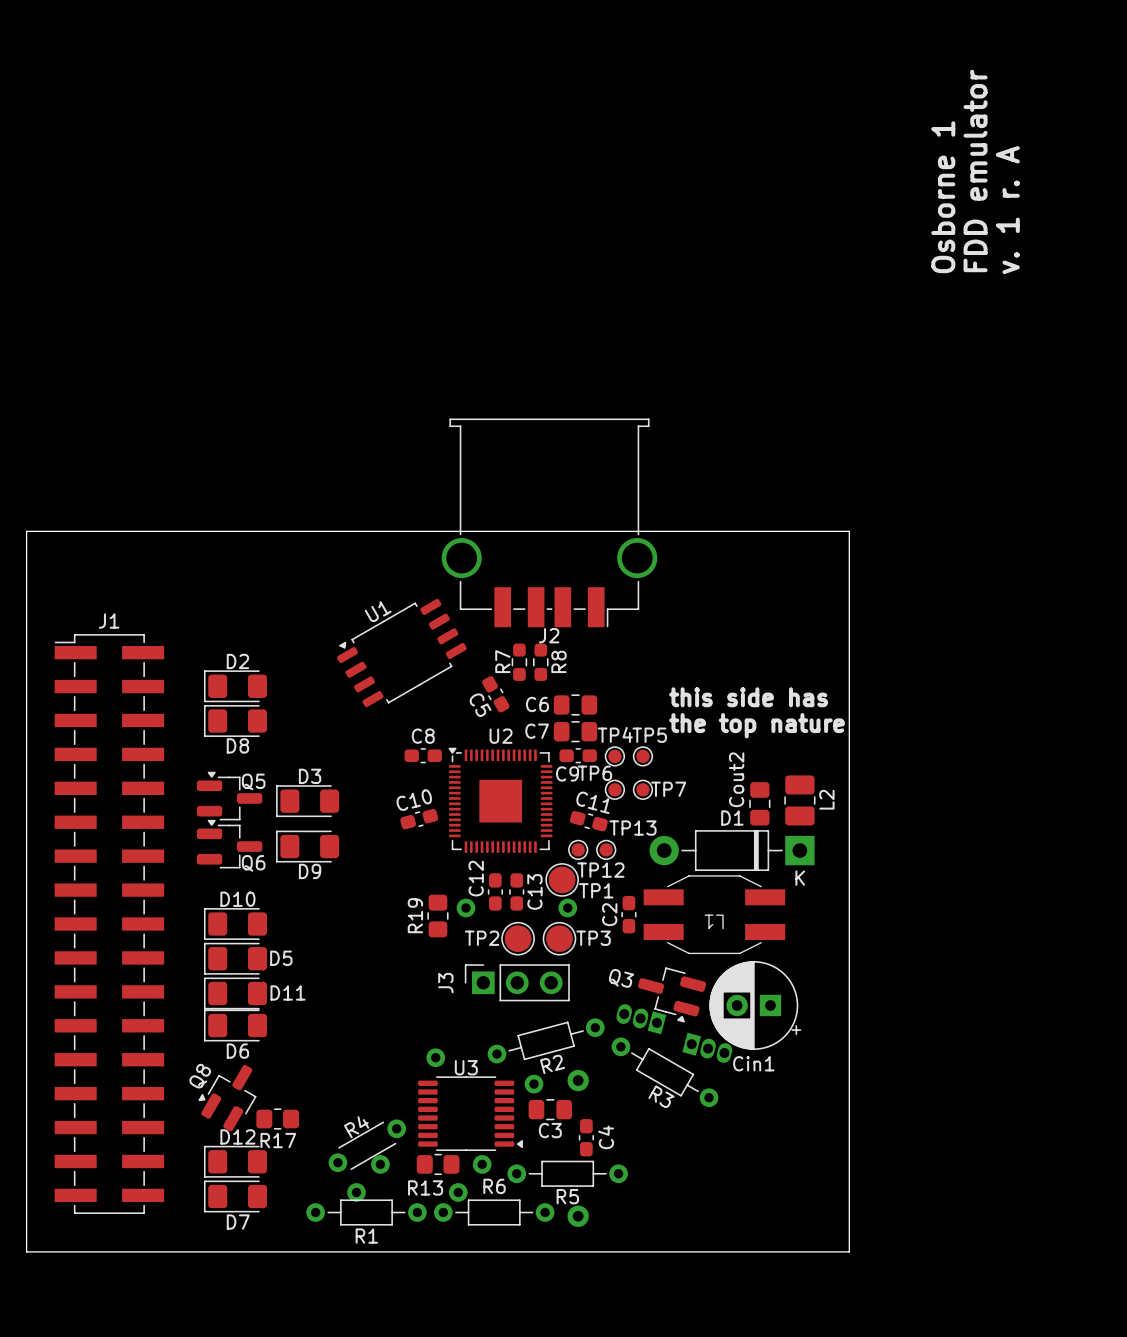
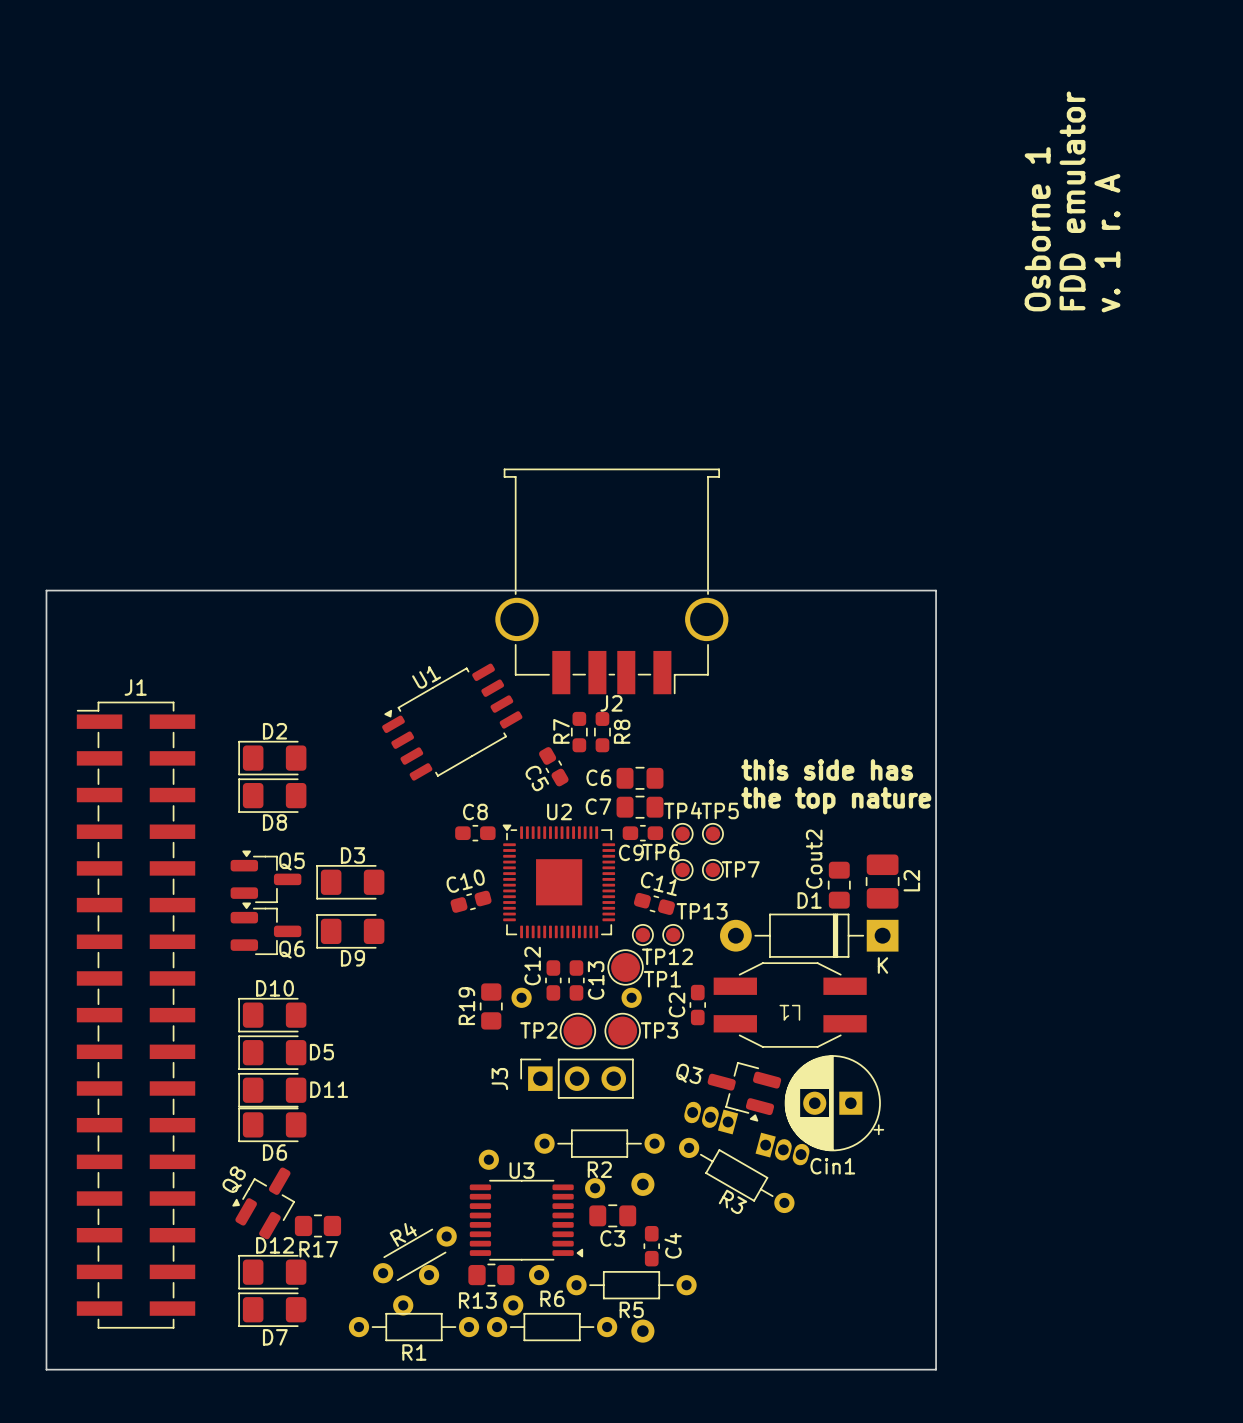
R2 rotation: 0° (546, 1040) -> 15° clockwise (599, 1143)

